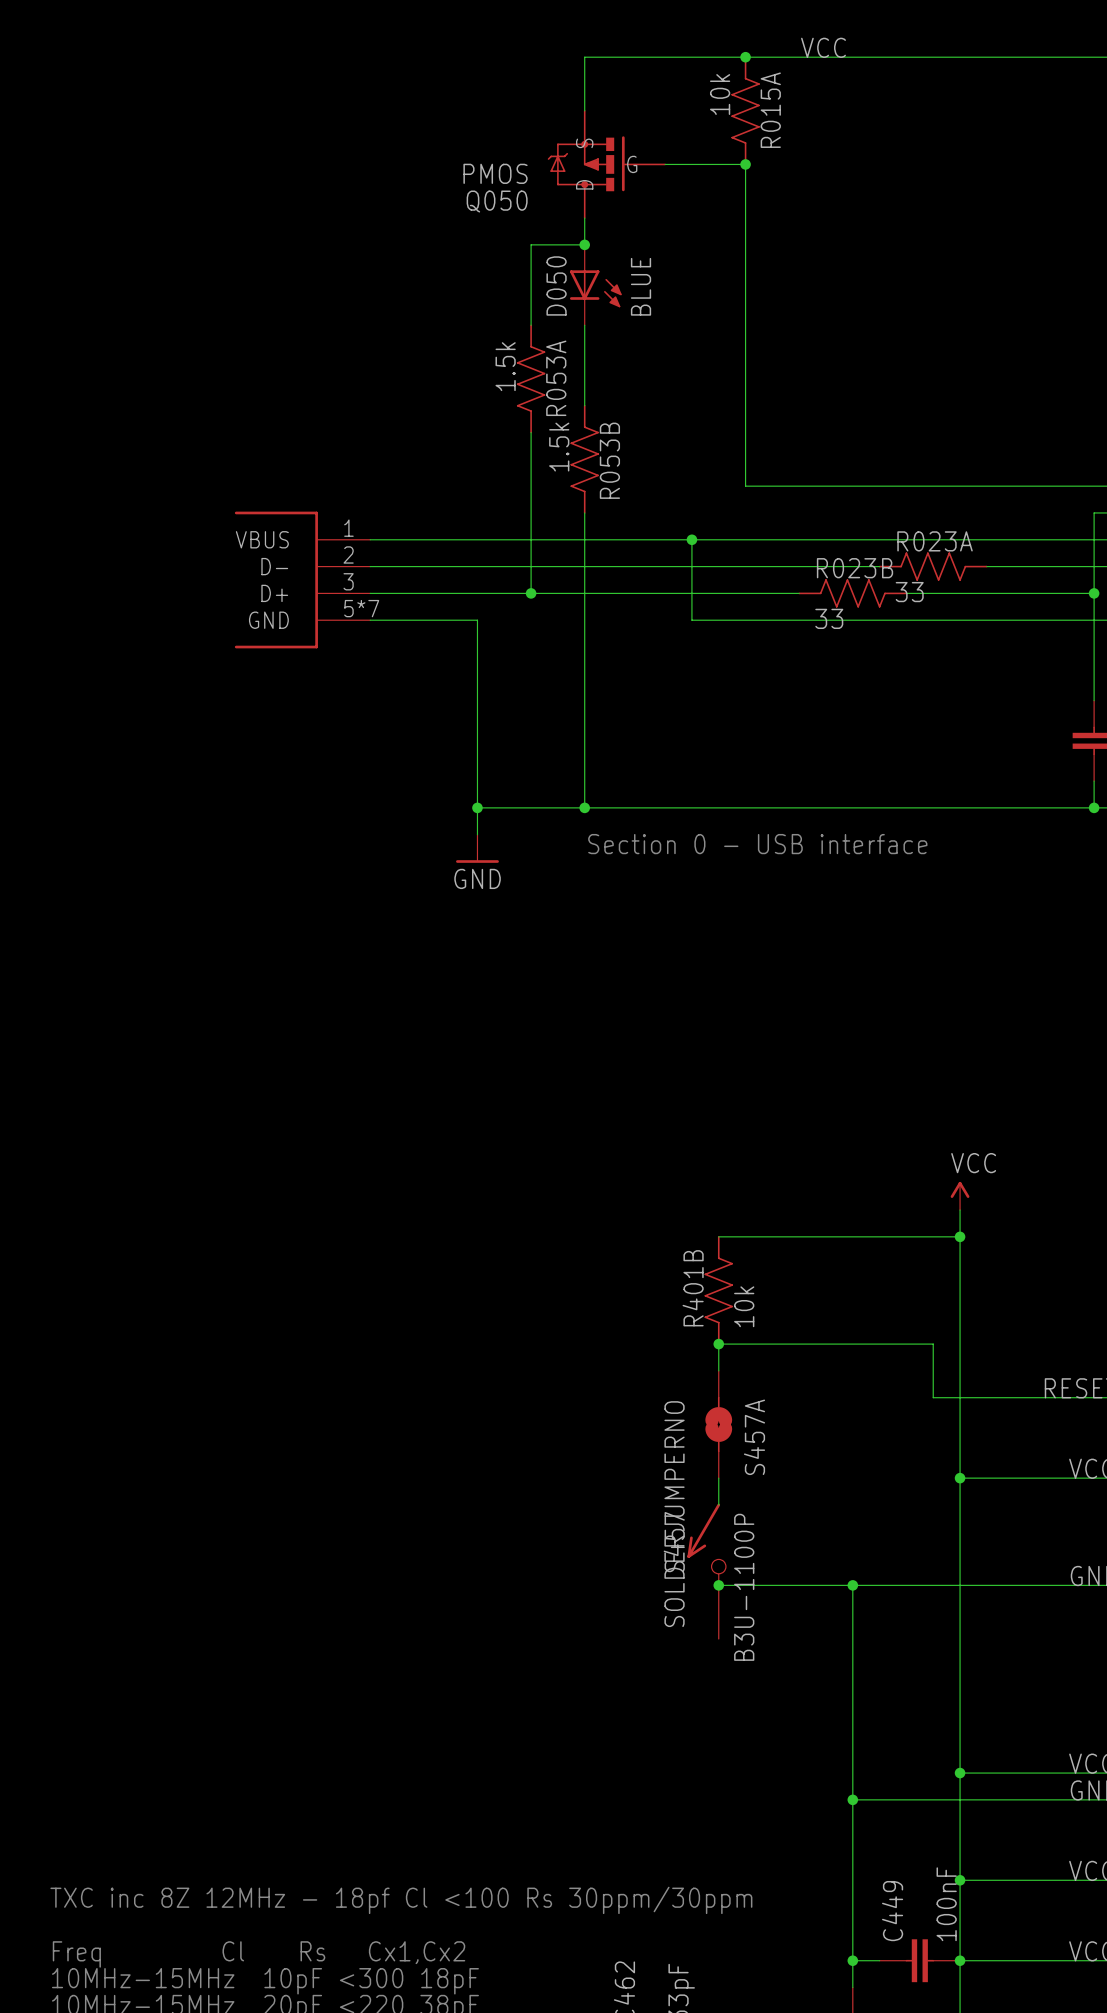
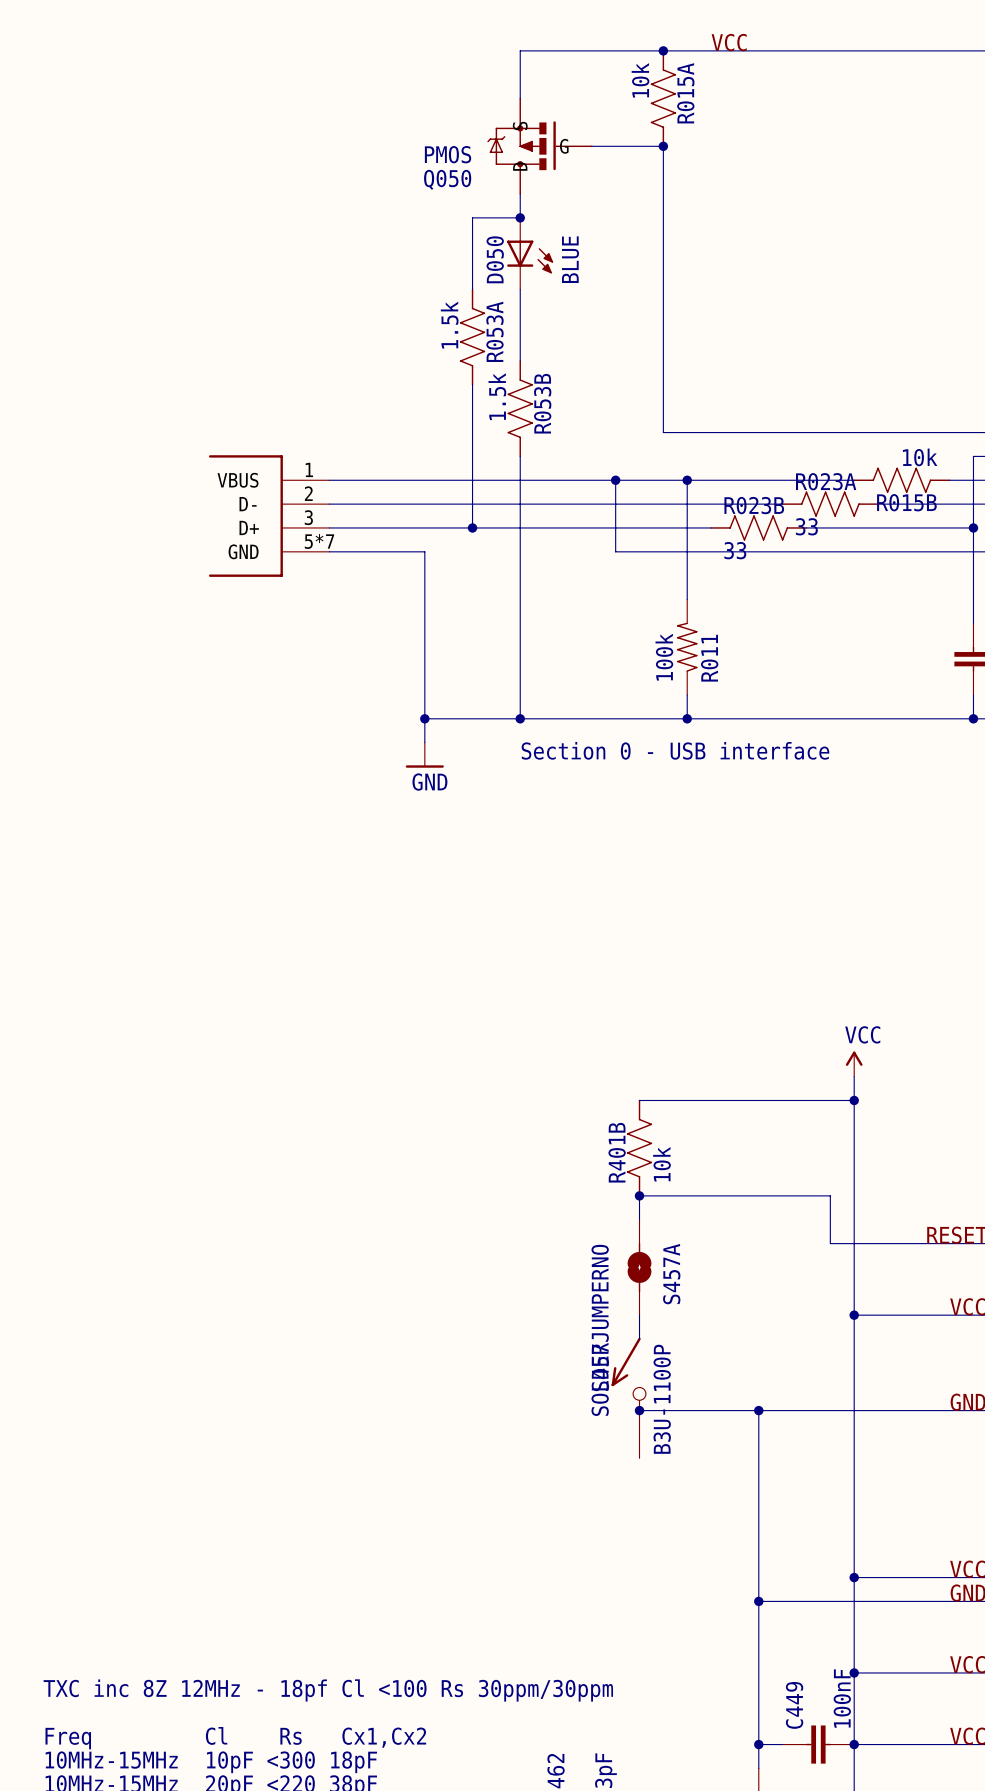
wire: none -> (687, 480) (687, 599)
junction: none -> (687, 480)
wire: (960, 539) (1067, 539) -> none
R015B: none -> 10k (901, 480)
R011: none -> 100k (687, 647)
wire: none -> (687, 694) (687, 718)
junction: none -> (687, 718)

